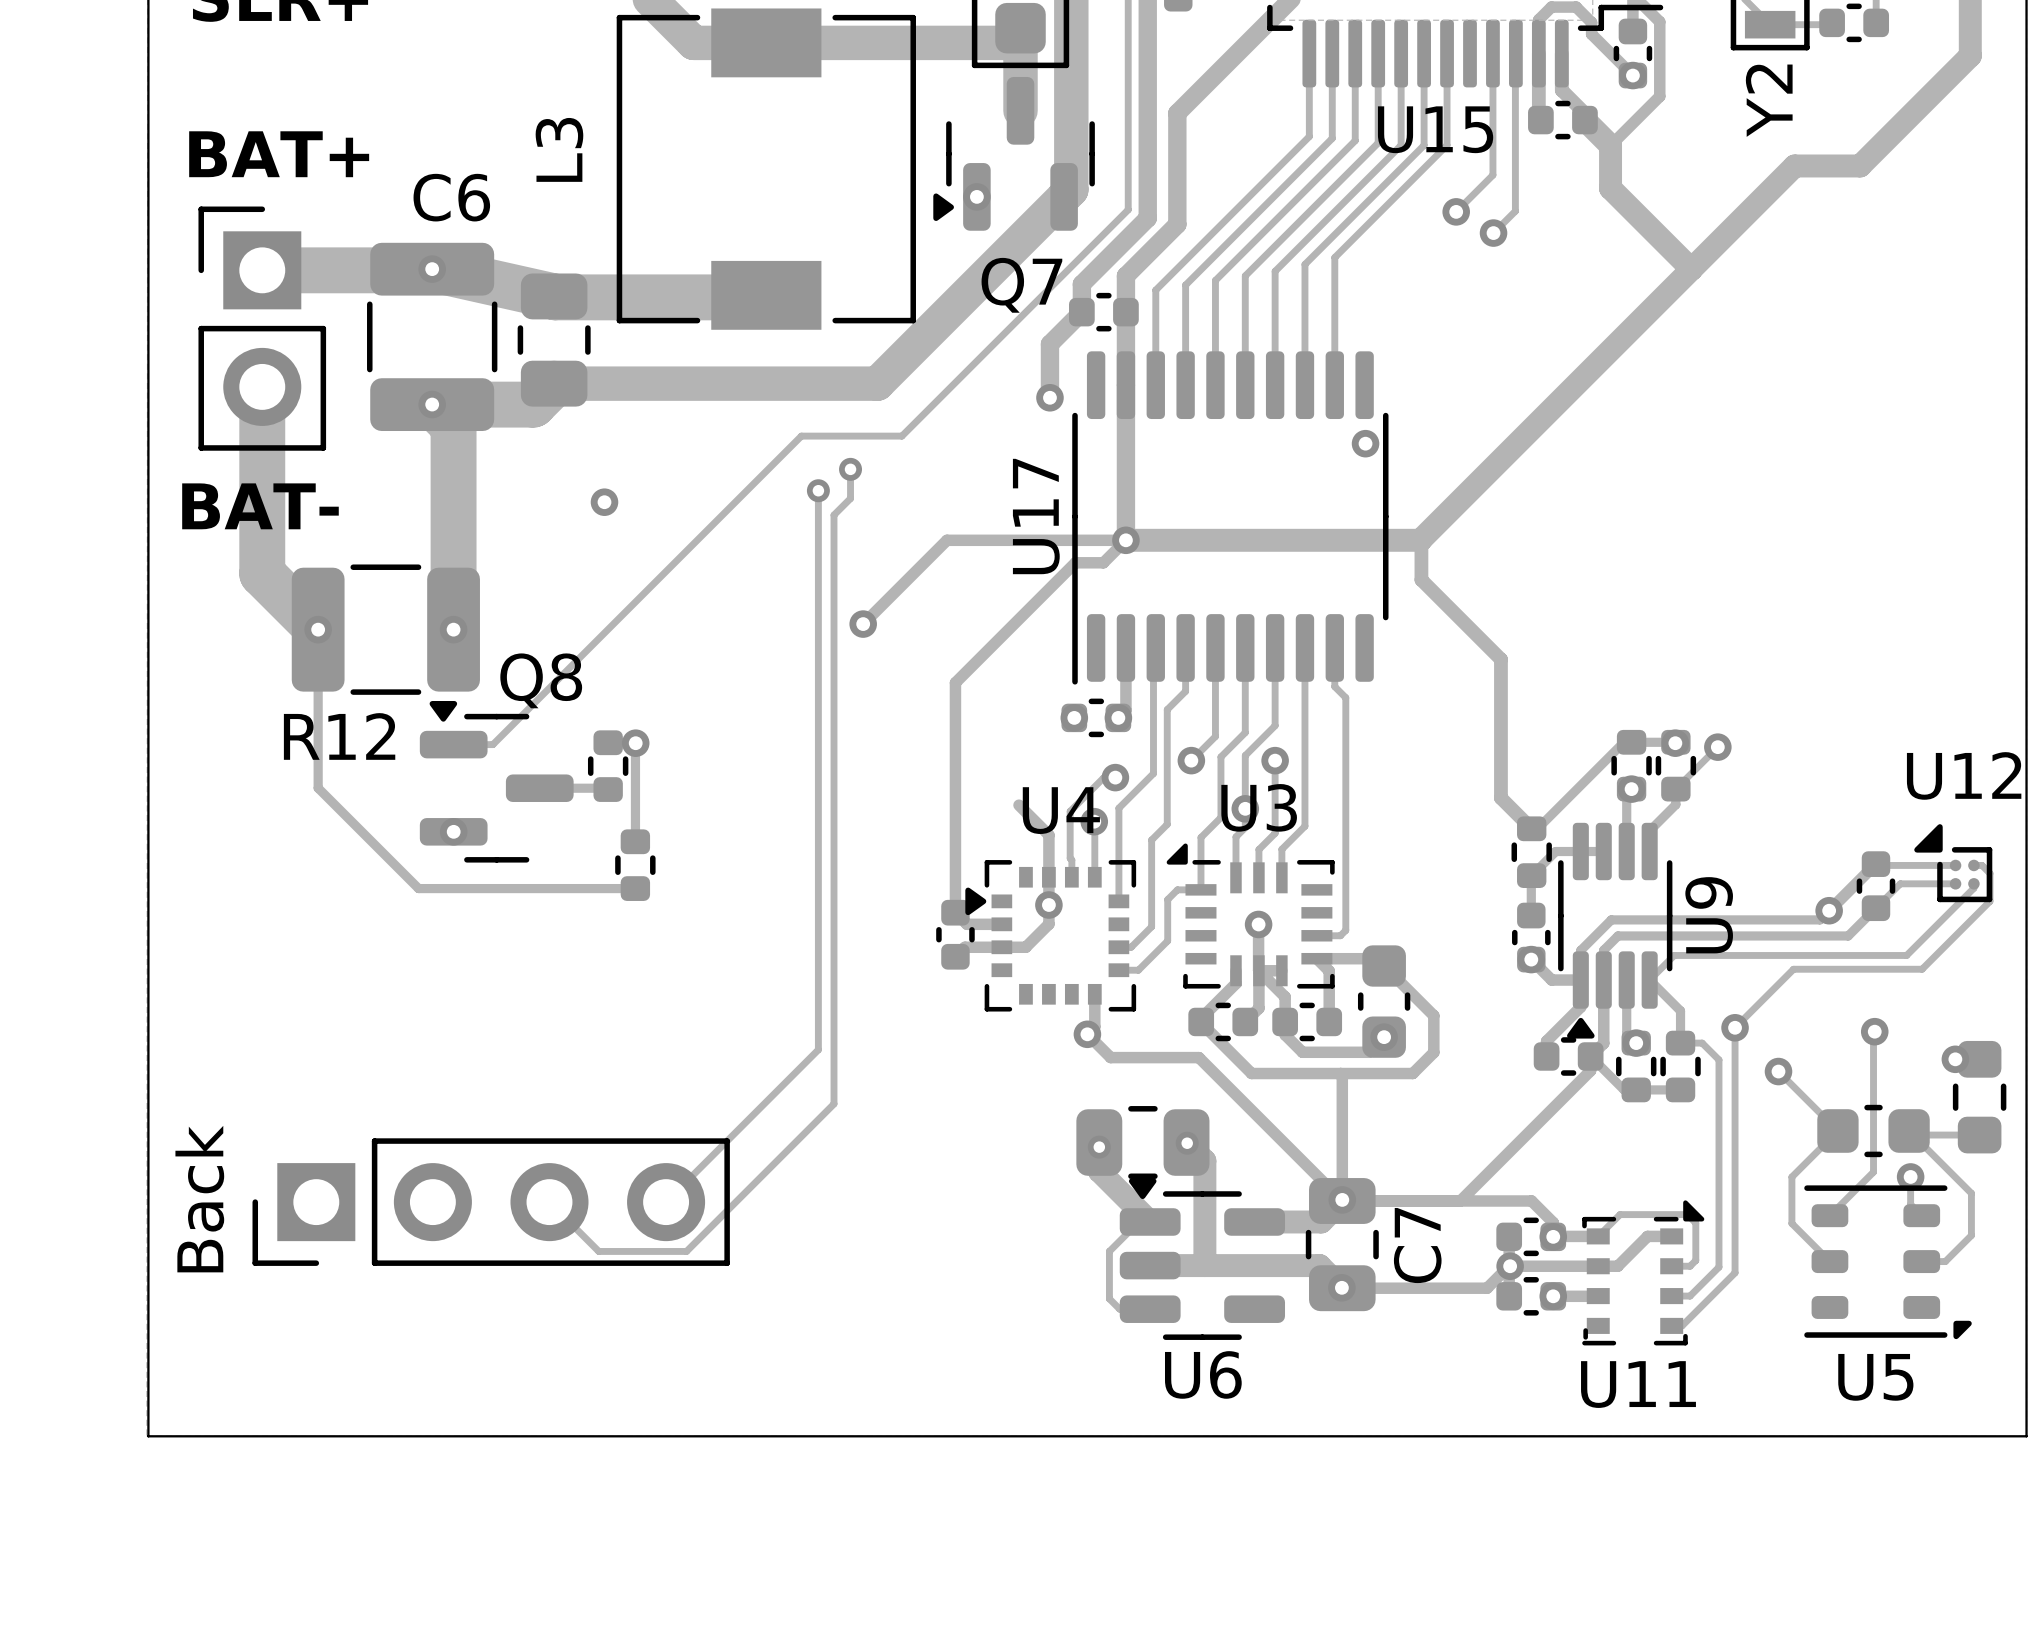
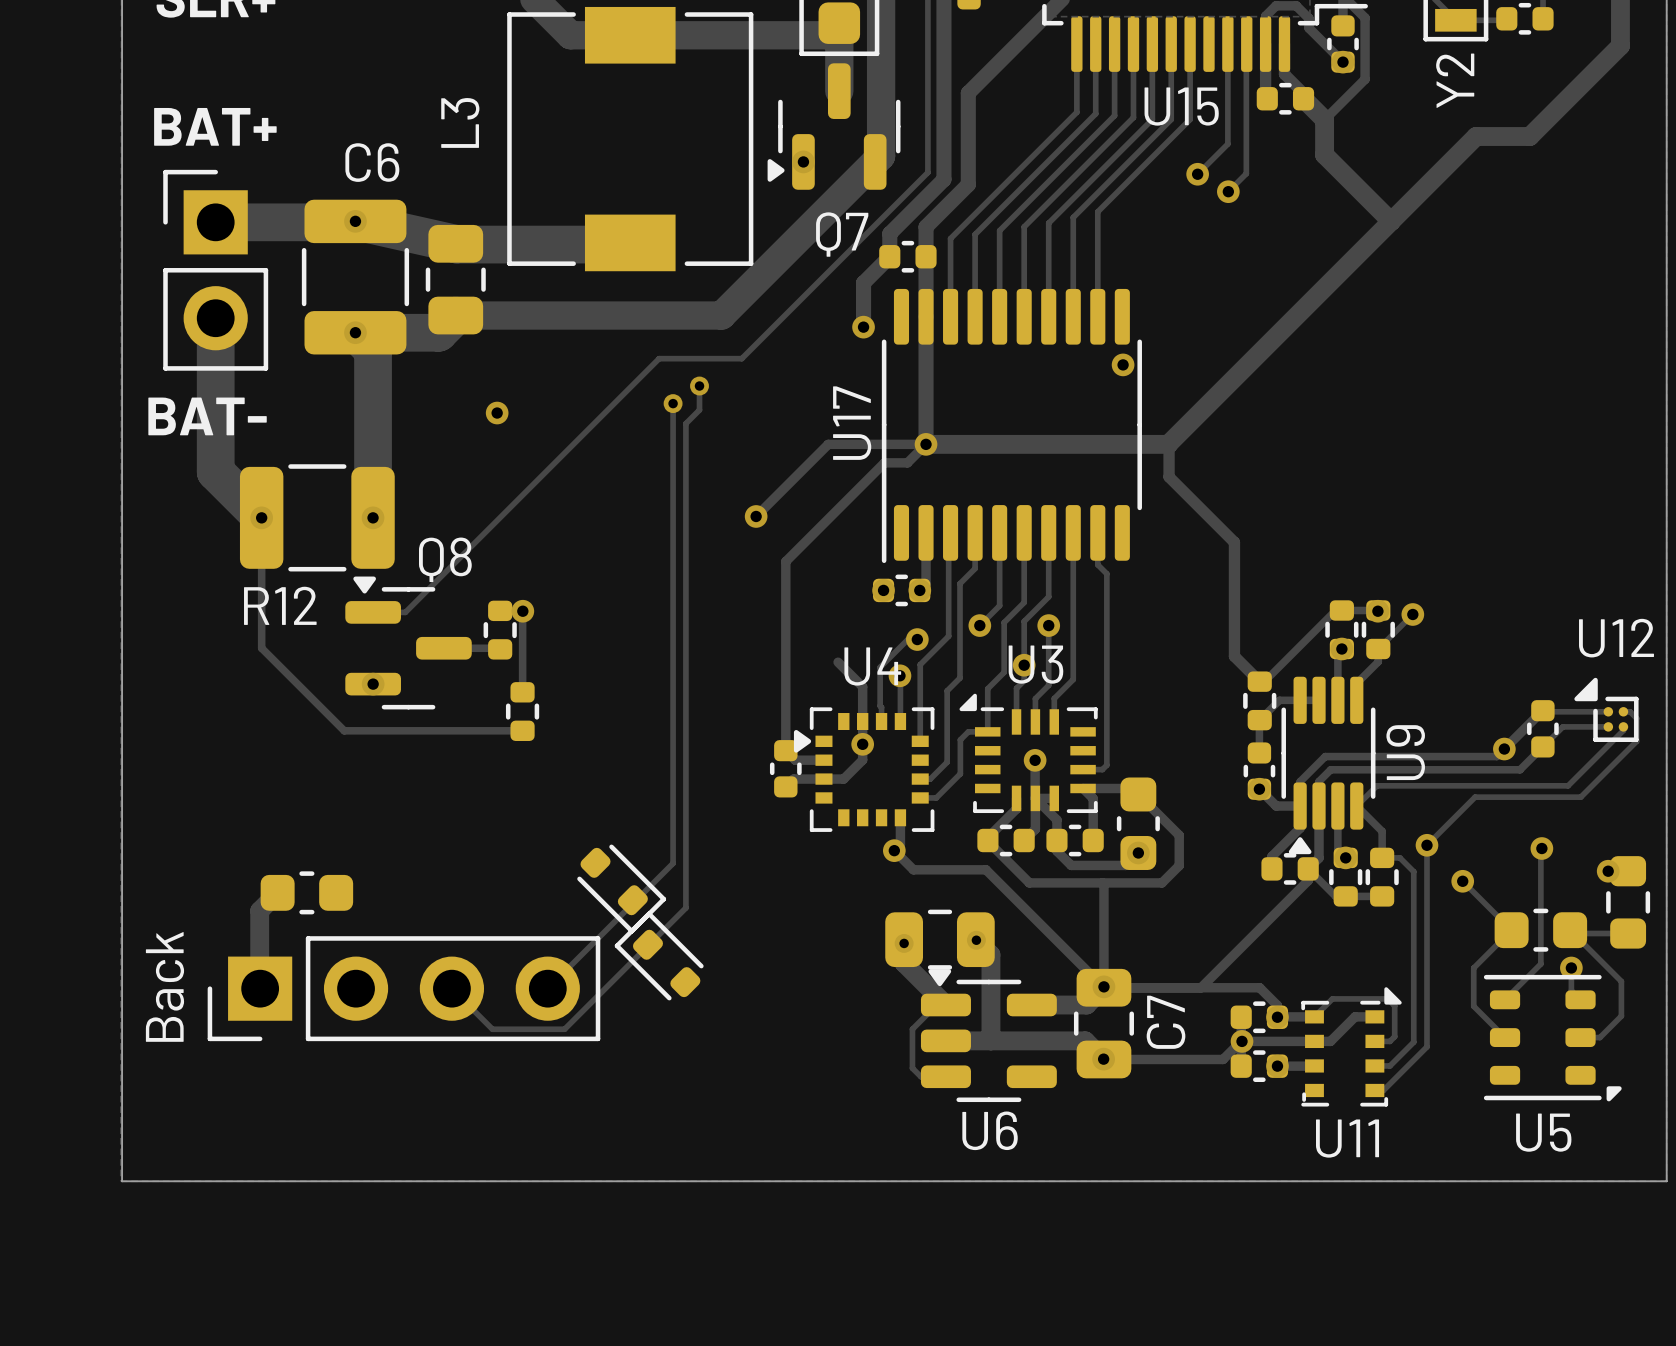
track: (1007, 540) (946, 540) (863, 624) -> (828, 444) (756, 516)
via position: (863, 624) -> (756, 516)
part: none -> (621, 889)
track: none -> (277, 892) (259, 910) (259, 988)
part: none -> (306, 892)
part: none -> (659, 955)

